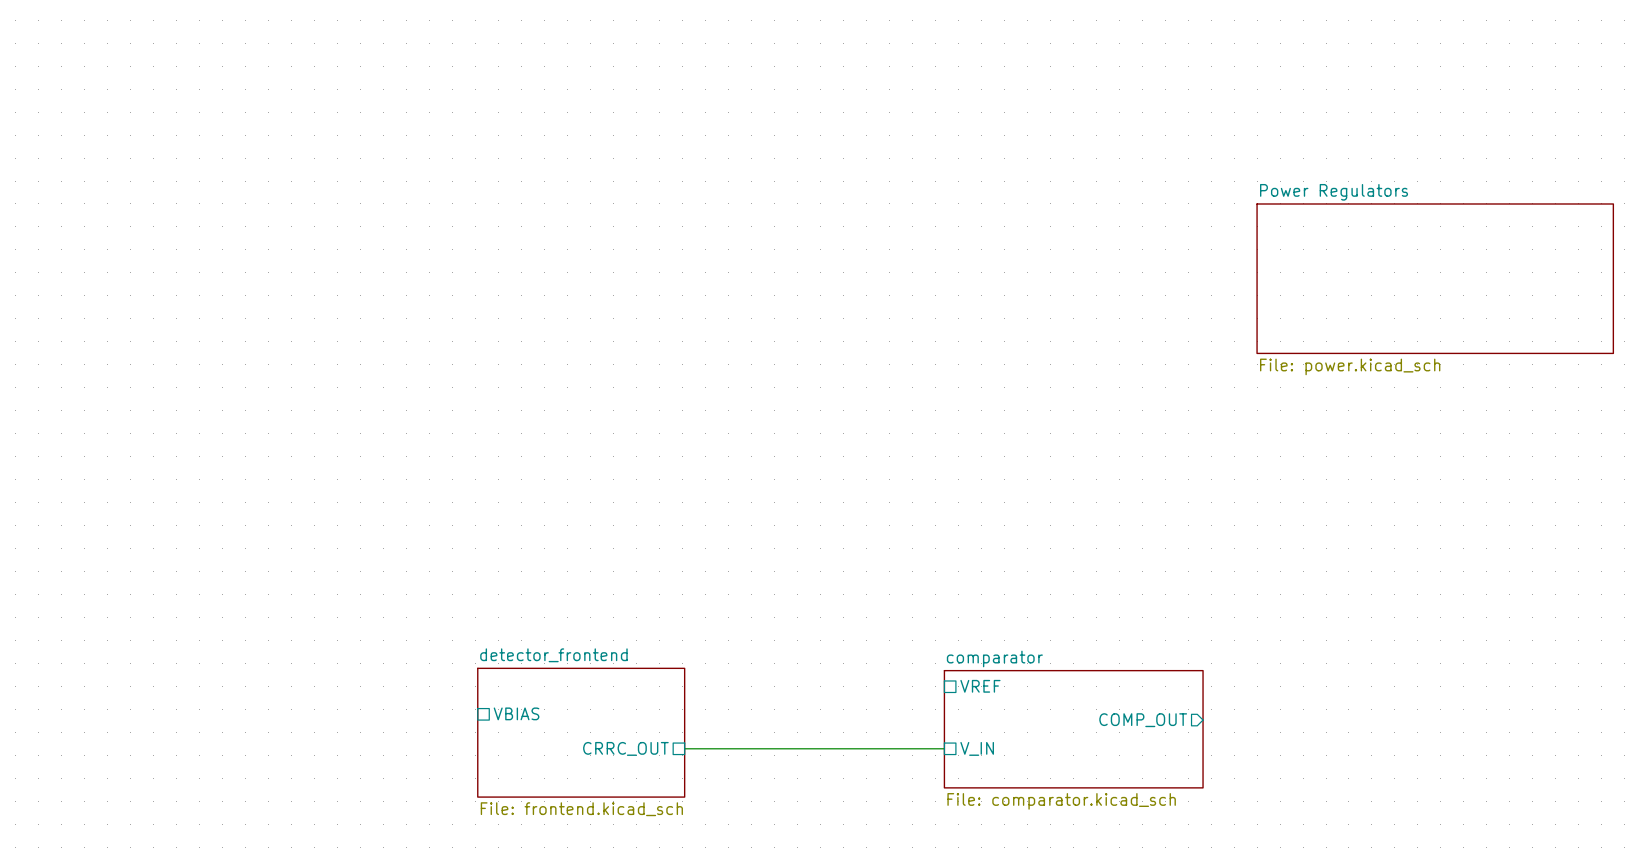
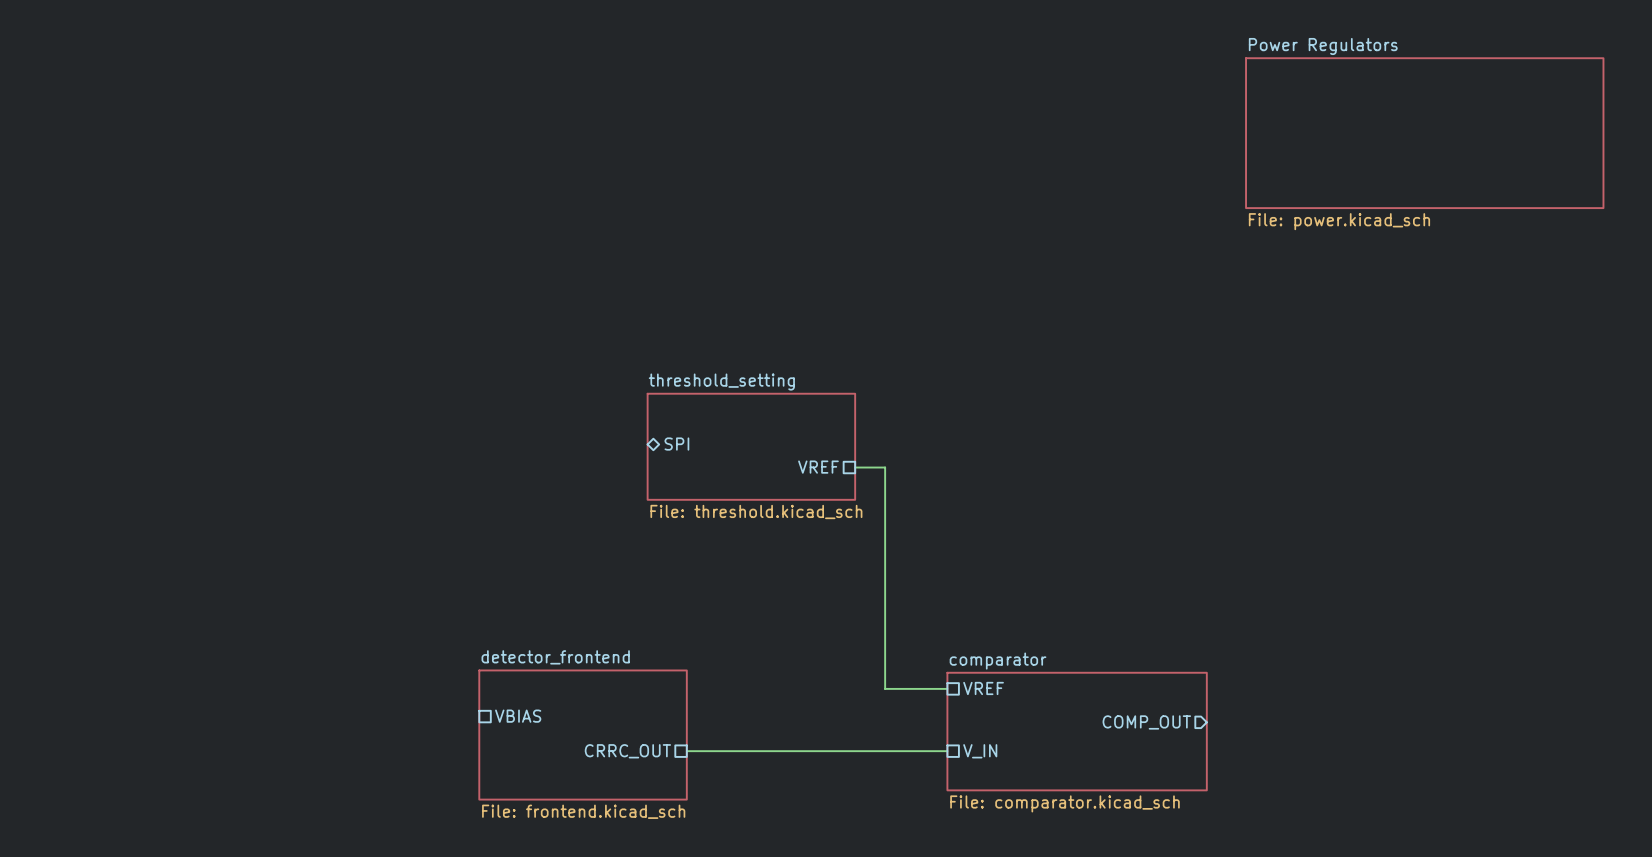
sheet Power Regulators position: (1435, 278) -> (1424, 133)
sheet pin: none -> SPI (676, 444)
sheet threshold_setting: none -> File: threshold.kicad_sch (751, 446)
sheet pin: none -> VREF (818, 467)
wire: none -> (855, 467) (885, 467) (885, 688) (947, 688)

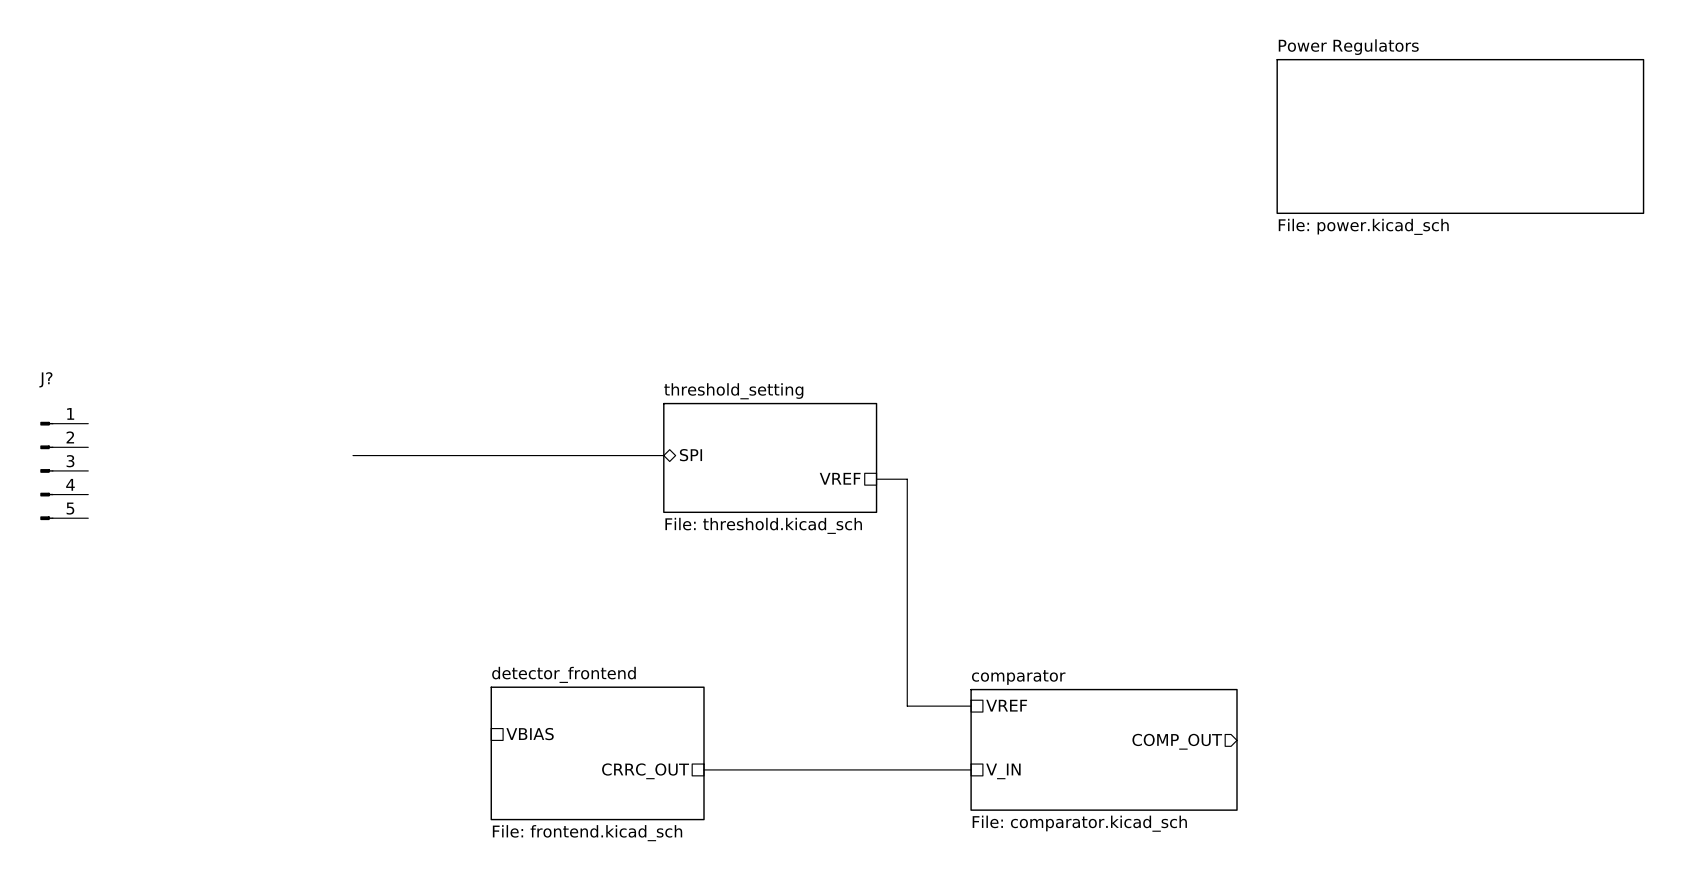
bus: none -> (352, 455) (663, 455)
J?: none -> (64, 470)

